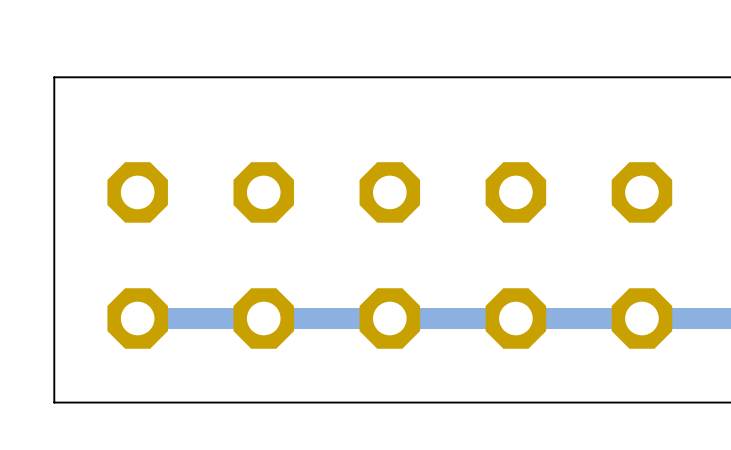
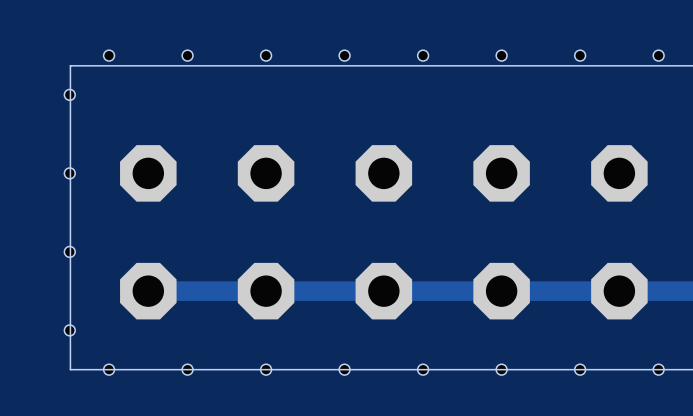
hole: none -> (109, 55)
hole: none -> (187, 55)
hole: none -> (266, 55)
hole: none -> (344, 55)
hole: none -> (423, 55)
hole: none -> (501, 55)
hole: none -> (580, 55)
hole: none -> (658, 55)
hole: none -> (69, 94)
hole: none -> (69, 173)
hole: none -> (69, 251)
hole: none -> (69, 330)
hole: none -> (109, 369)
hole: none -> (187, 369)
hole: none -> (266, 369)
hole: none -> (344, 369)
hole: none -> (423, 369)
hole: none -> (501, 369)
hole: none -> (580, 369)
hole: none -> (658, 369)

